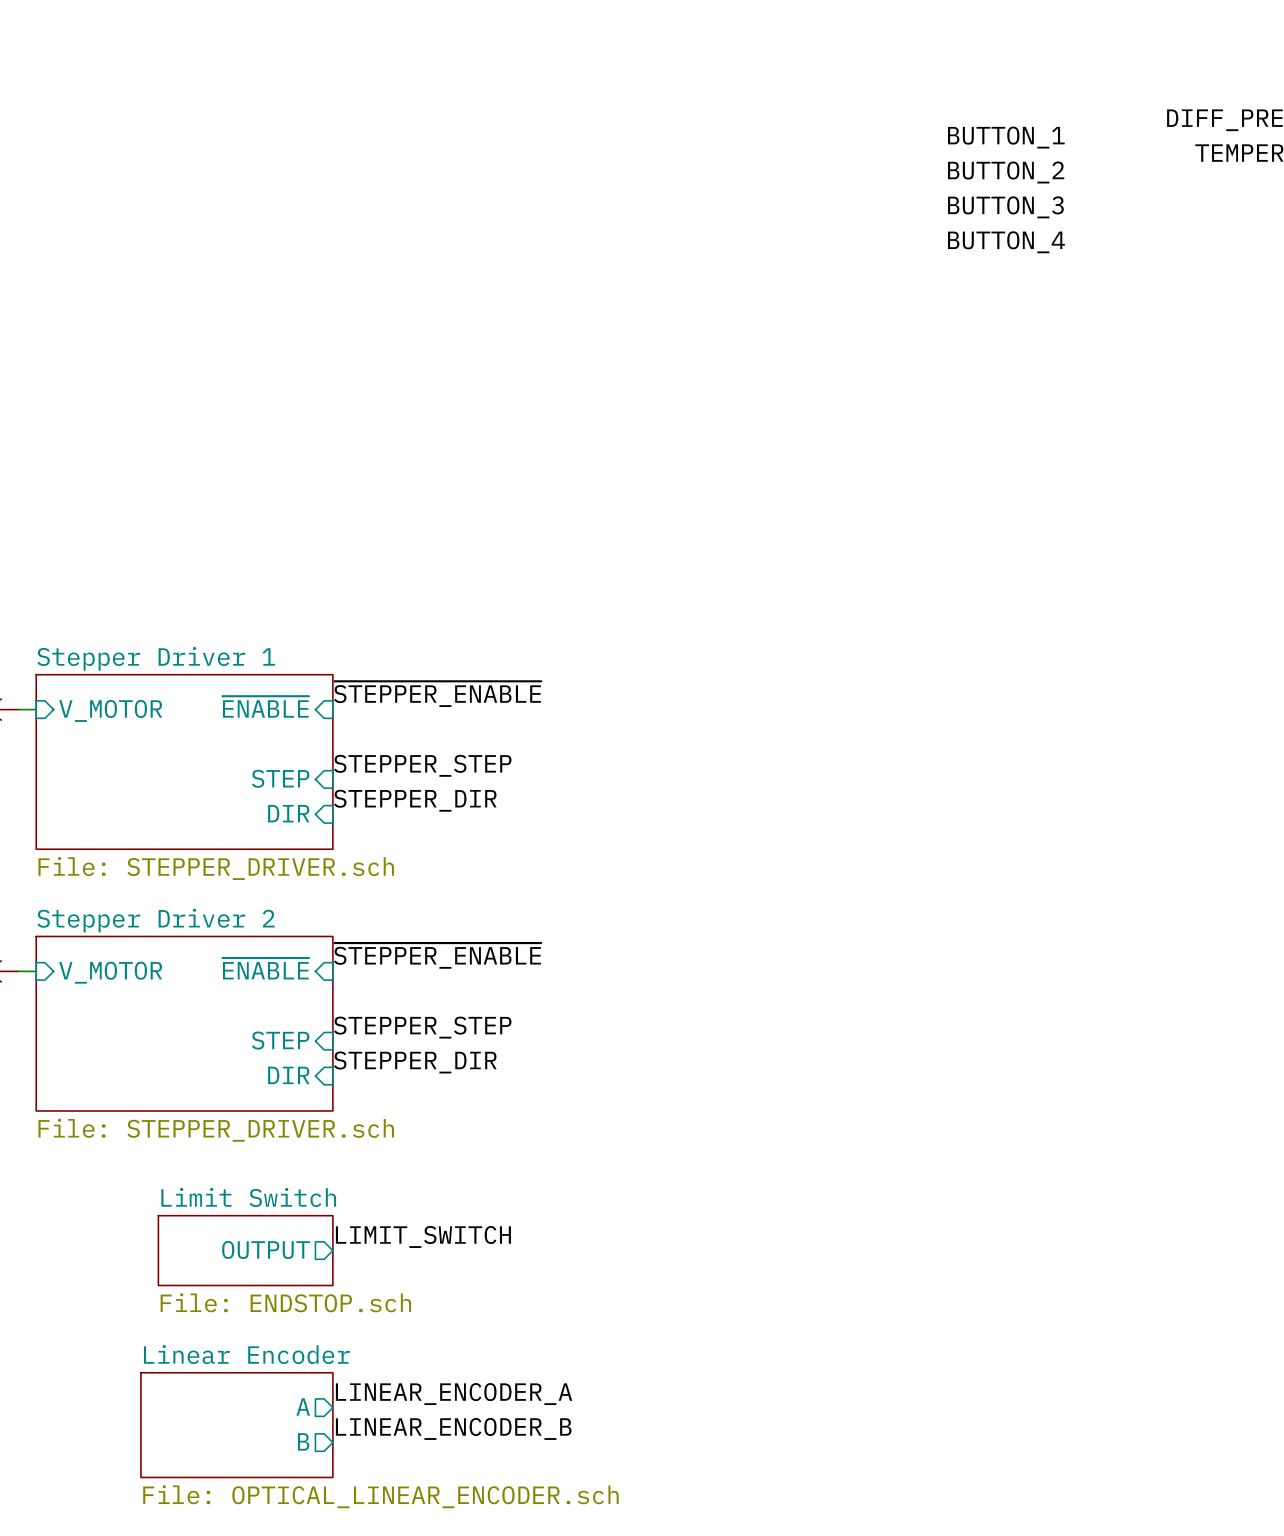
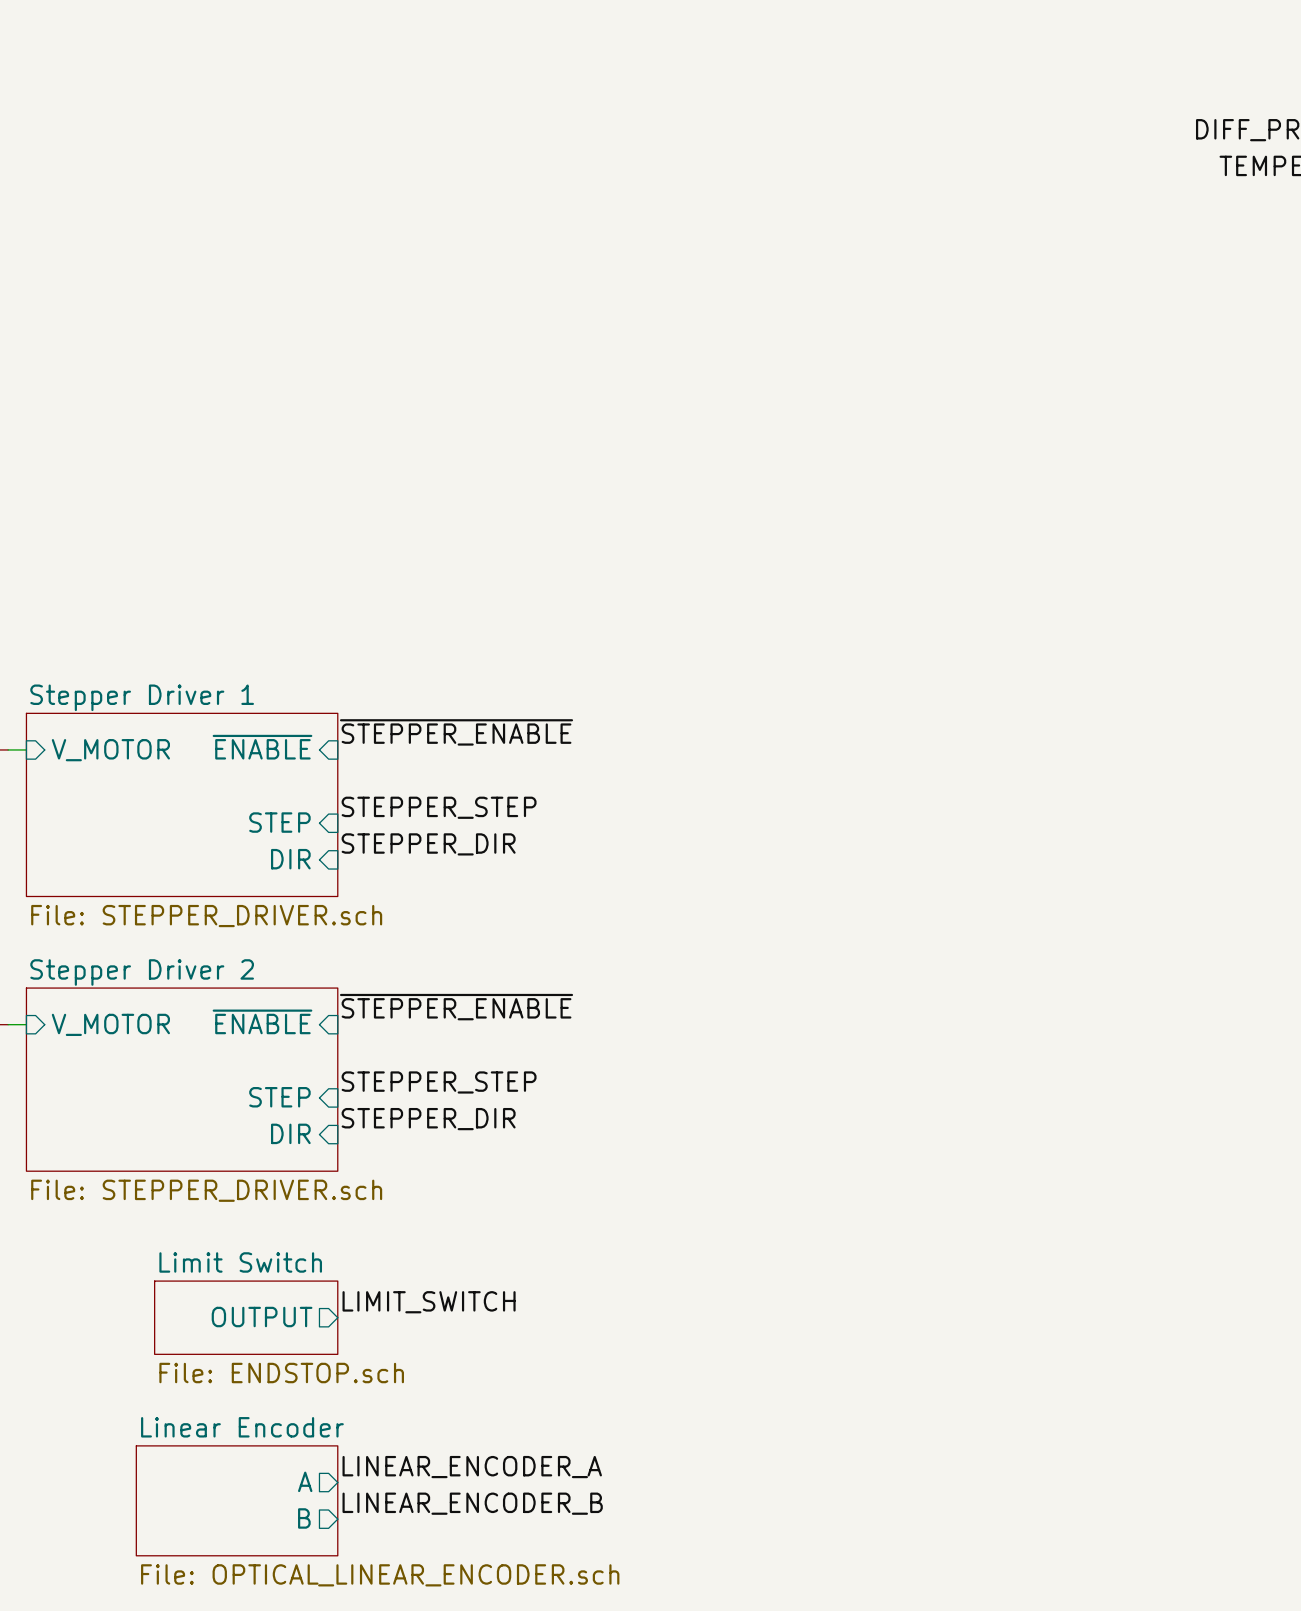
label: BUTTON_1 (1006, 137) -> none
label: BUTTON_2 (1006, 172) -> none
label: BUTTON_3 (1005, 207) -> none
label: BUTTON_4 (1006, 242) -> none

